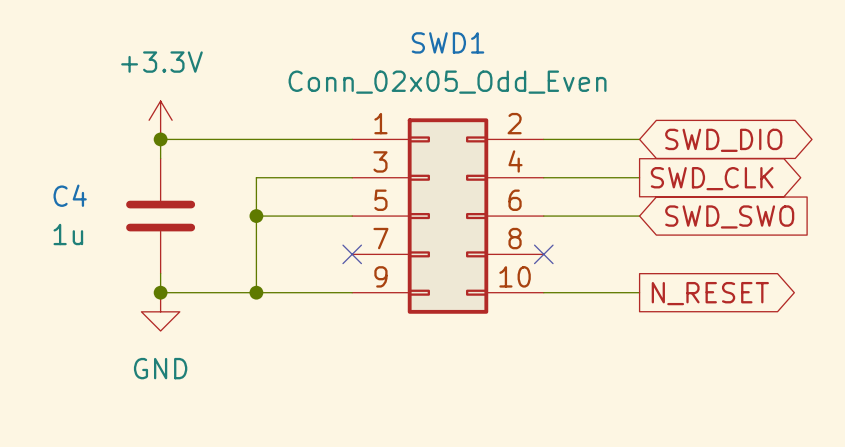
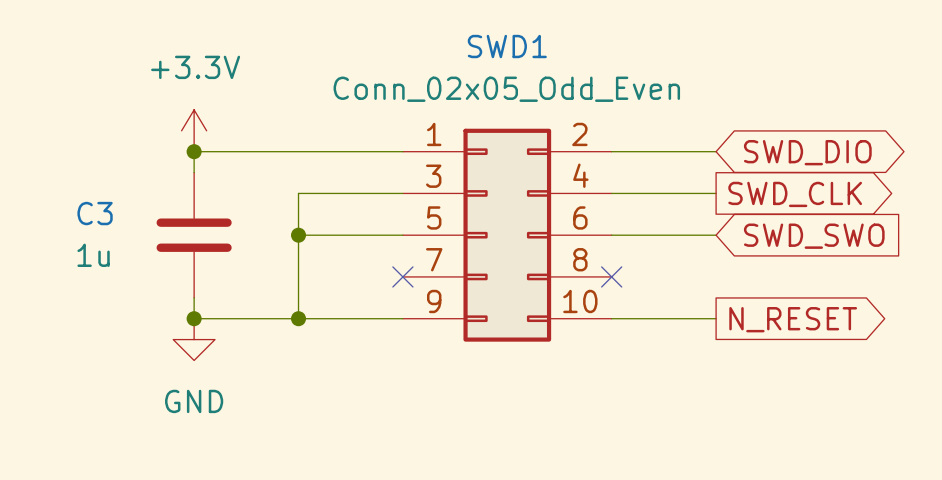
C4 name: C4 (70, 195) -> C3 (95, 213)

